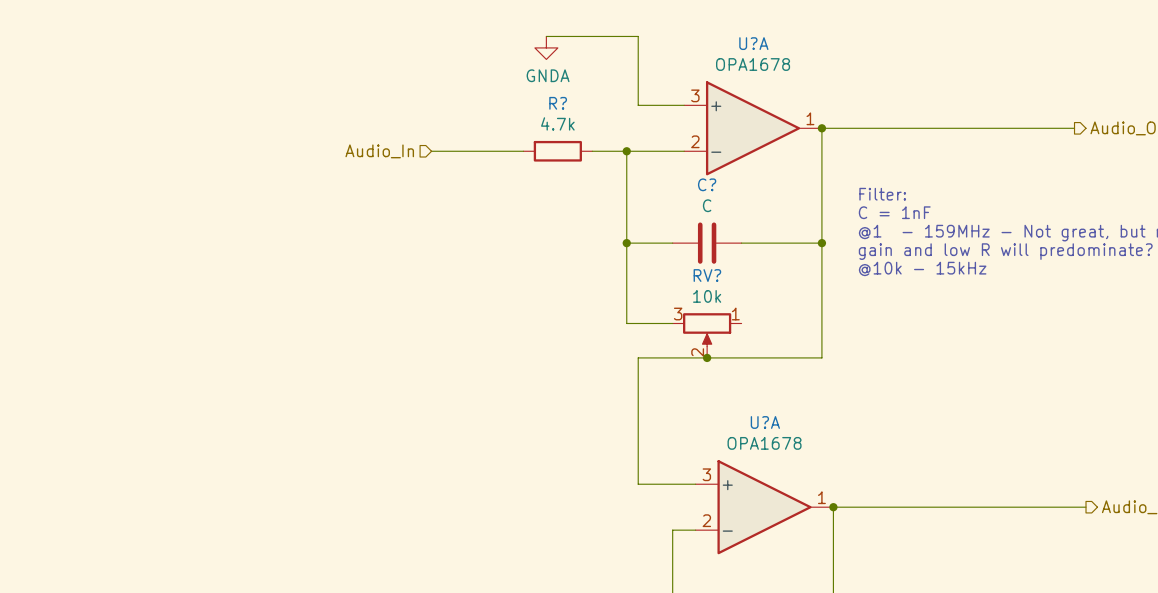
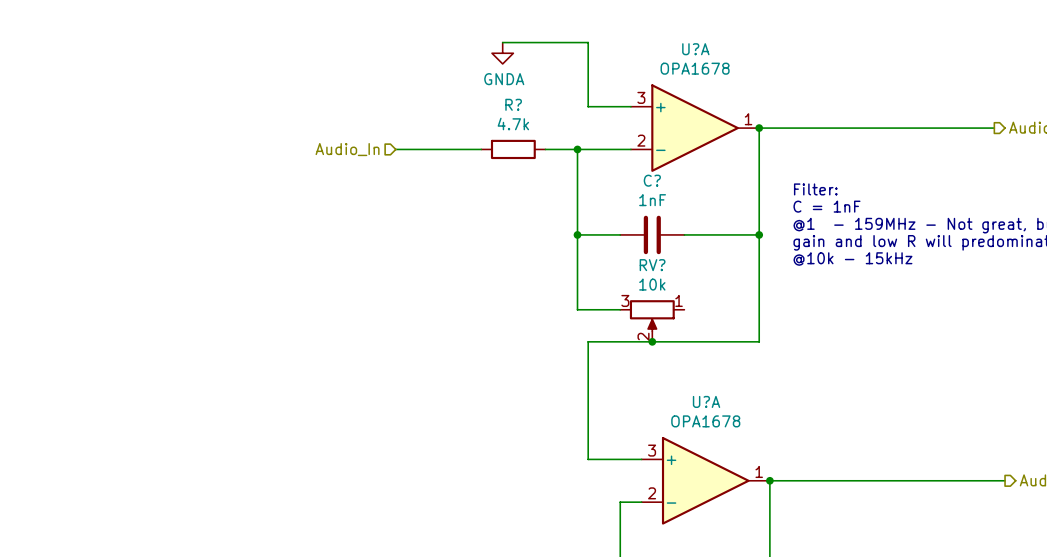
C? value: C (707, 205) -> 1nF (652, 200)

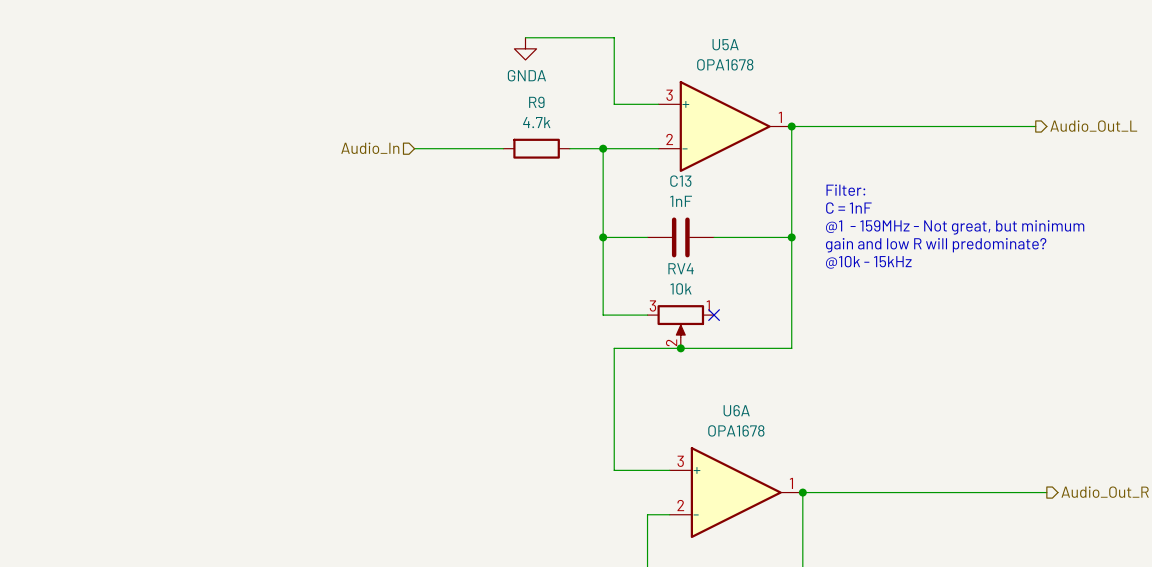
U?A name: U?A (695, 49) -> U5A (725, 44)
R? name: R? (513, 104) -> R9 (536, 102)
C? name: C? (652, 180) -> C13 (680, 181)
RV? name: RV? (652, 265) -> RV4 (681, 268)
no-connect mark: none -> (714, 315)
U?A name: U?A (706, 401) -> U6A (736, 410)

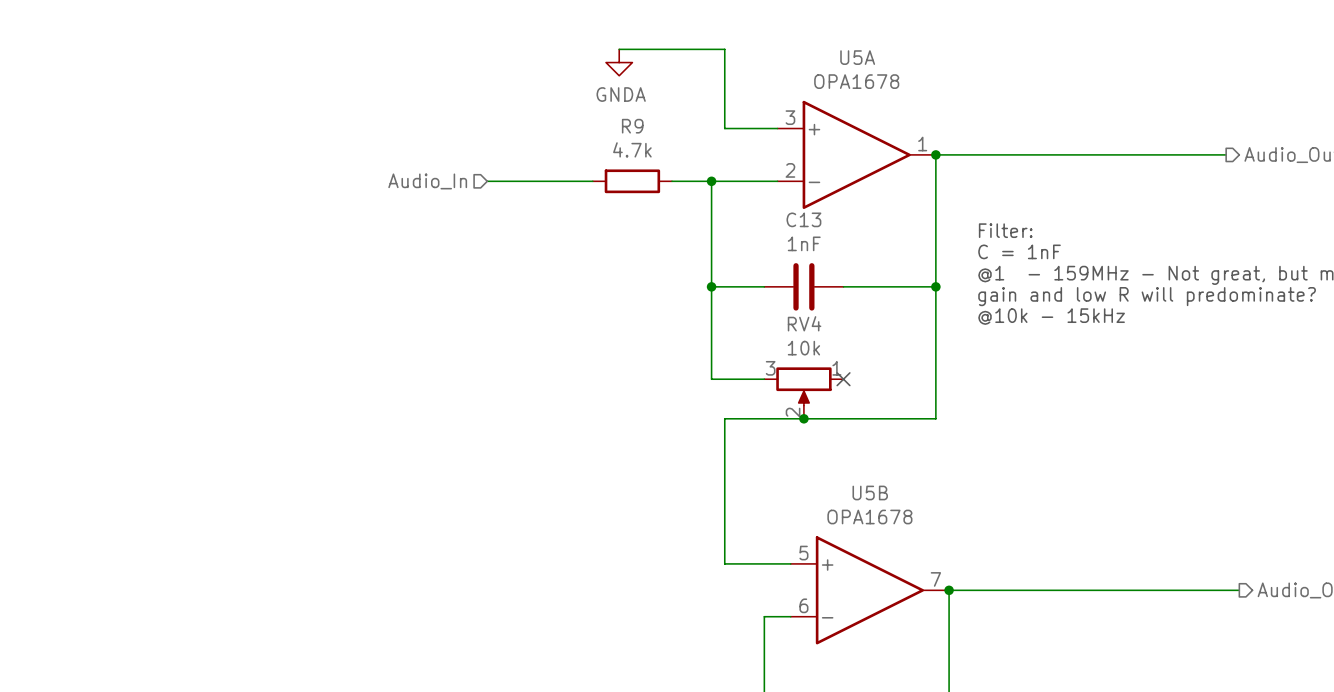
U6A name: U6A (736, 410) -> U5B (870, 492)
U6A pin number: 3 (680, 461) -> 5 (803, 553)
U6A pin number: 1 (791, 483) -> 7 (935, 579)
U6A pin number: 2 (680, 505) -> 6 (803, 605)

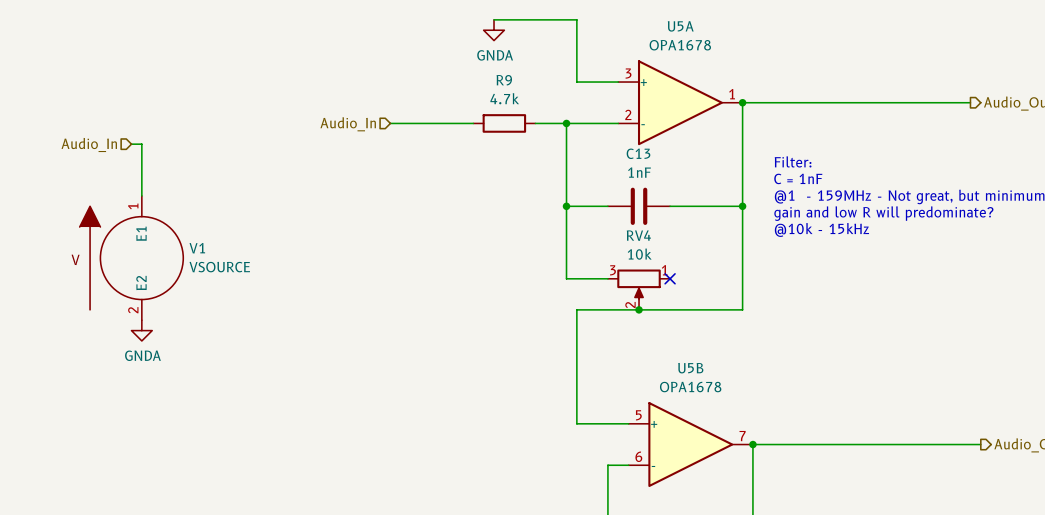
hierarchical label: none -> Audio_In (89, 144)
wire: none -> (131, 144) (141, 144) (141, 195)
V1: none -> VSOURCE (131, 258)
power symbol: none -> GNDA (141, 330)

